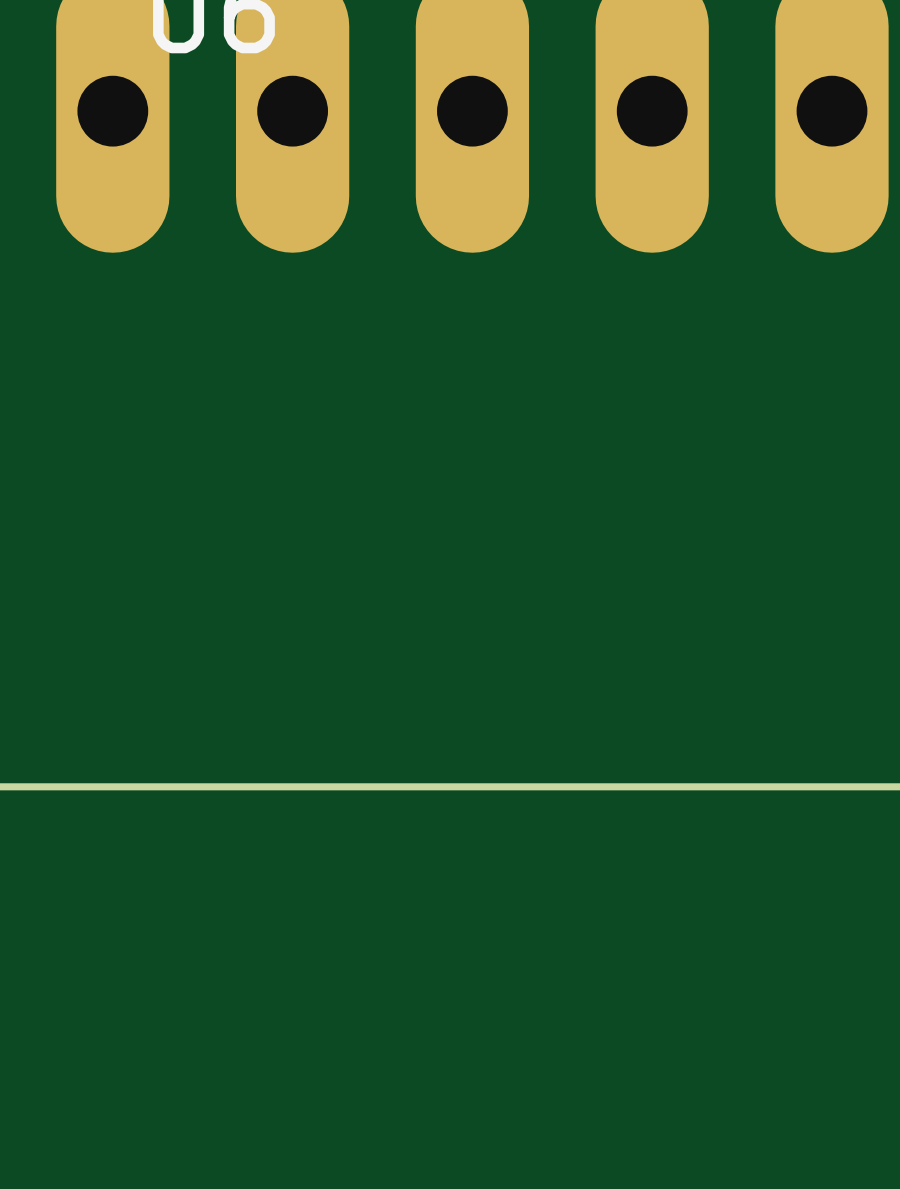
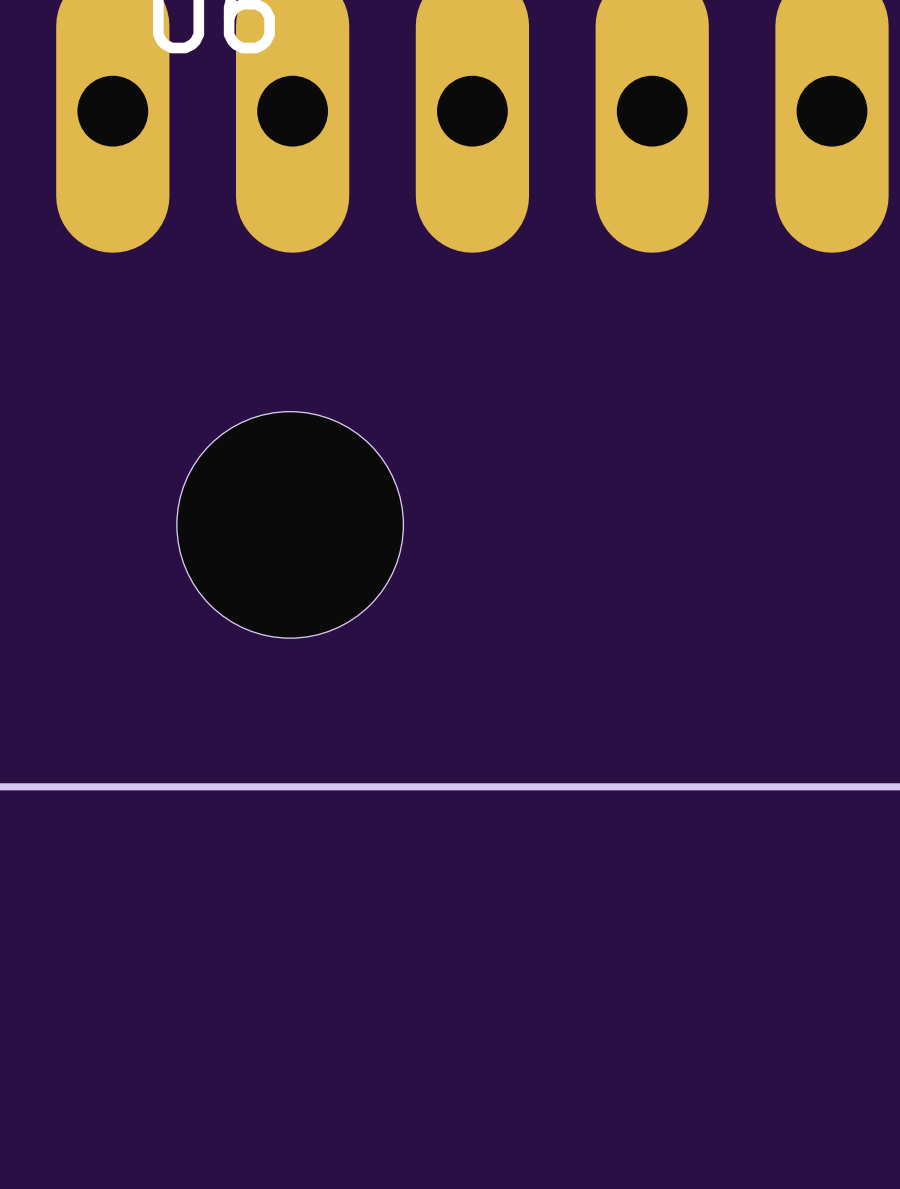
part: none -> (290, 524)

